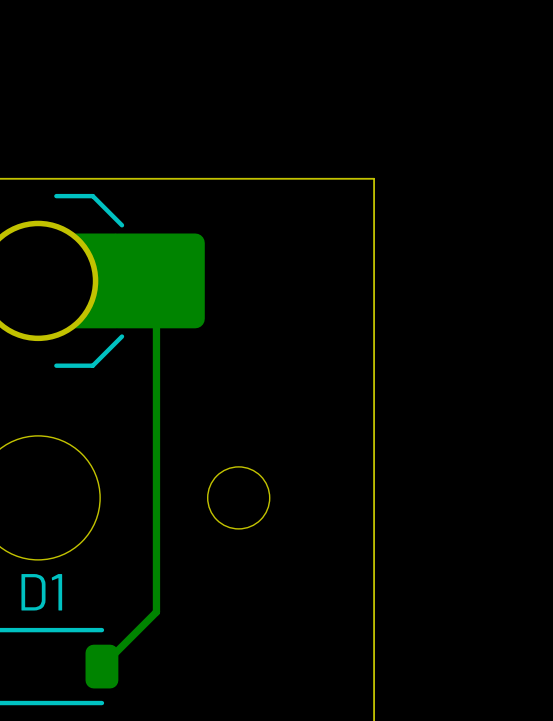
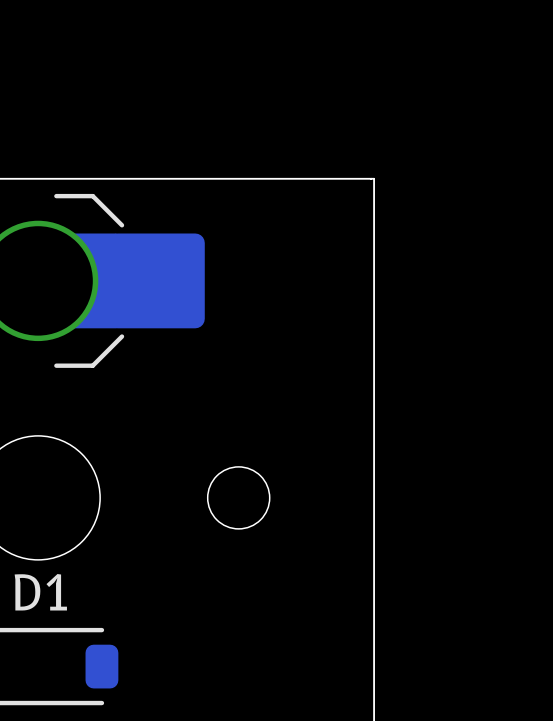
track: (156, 280) (156, 612) (101, 666) -> none

